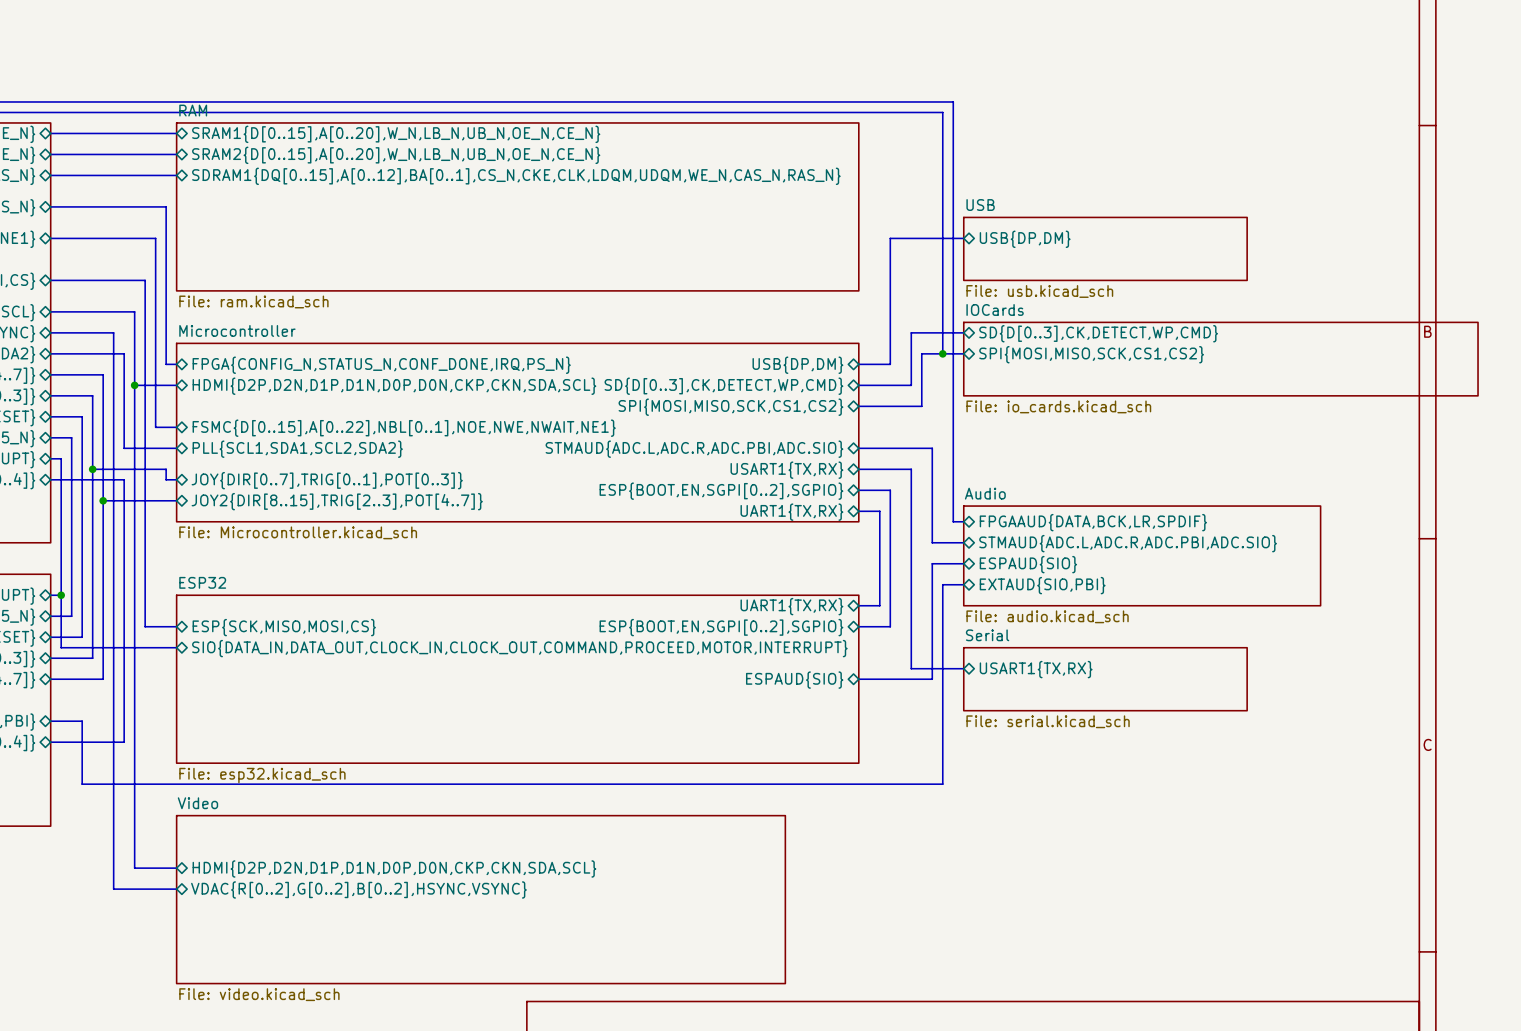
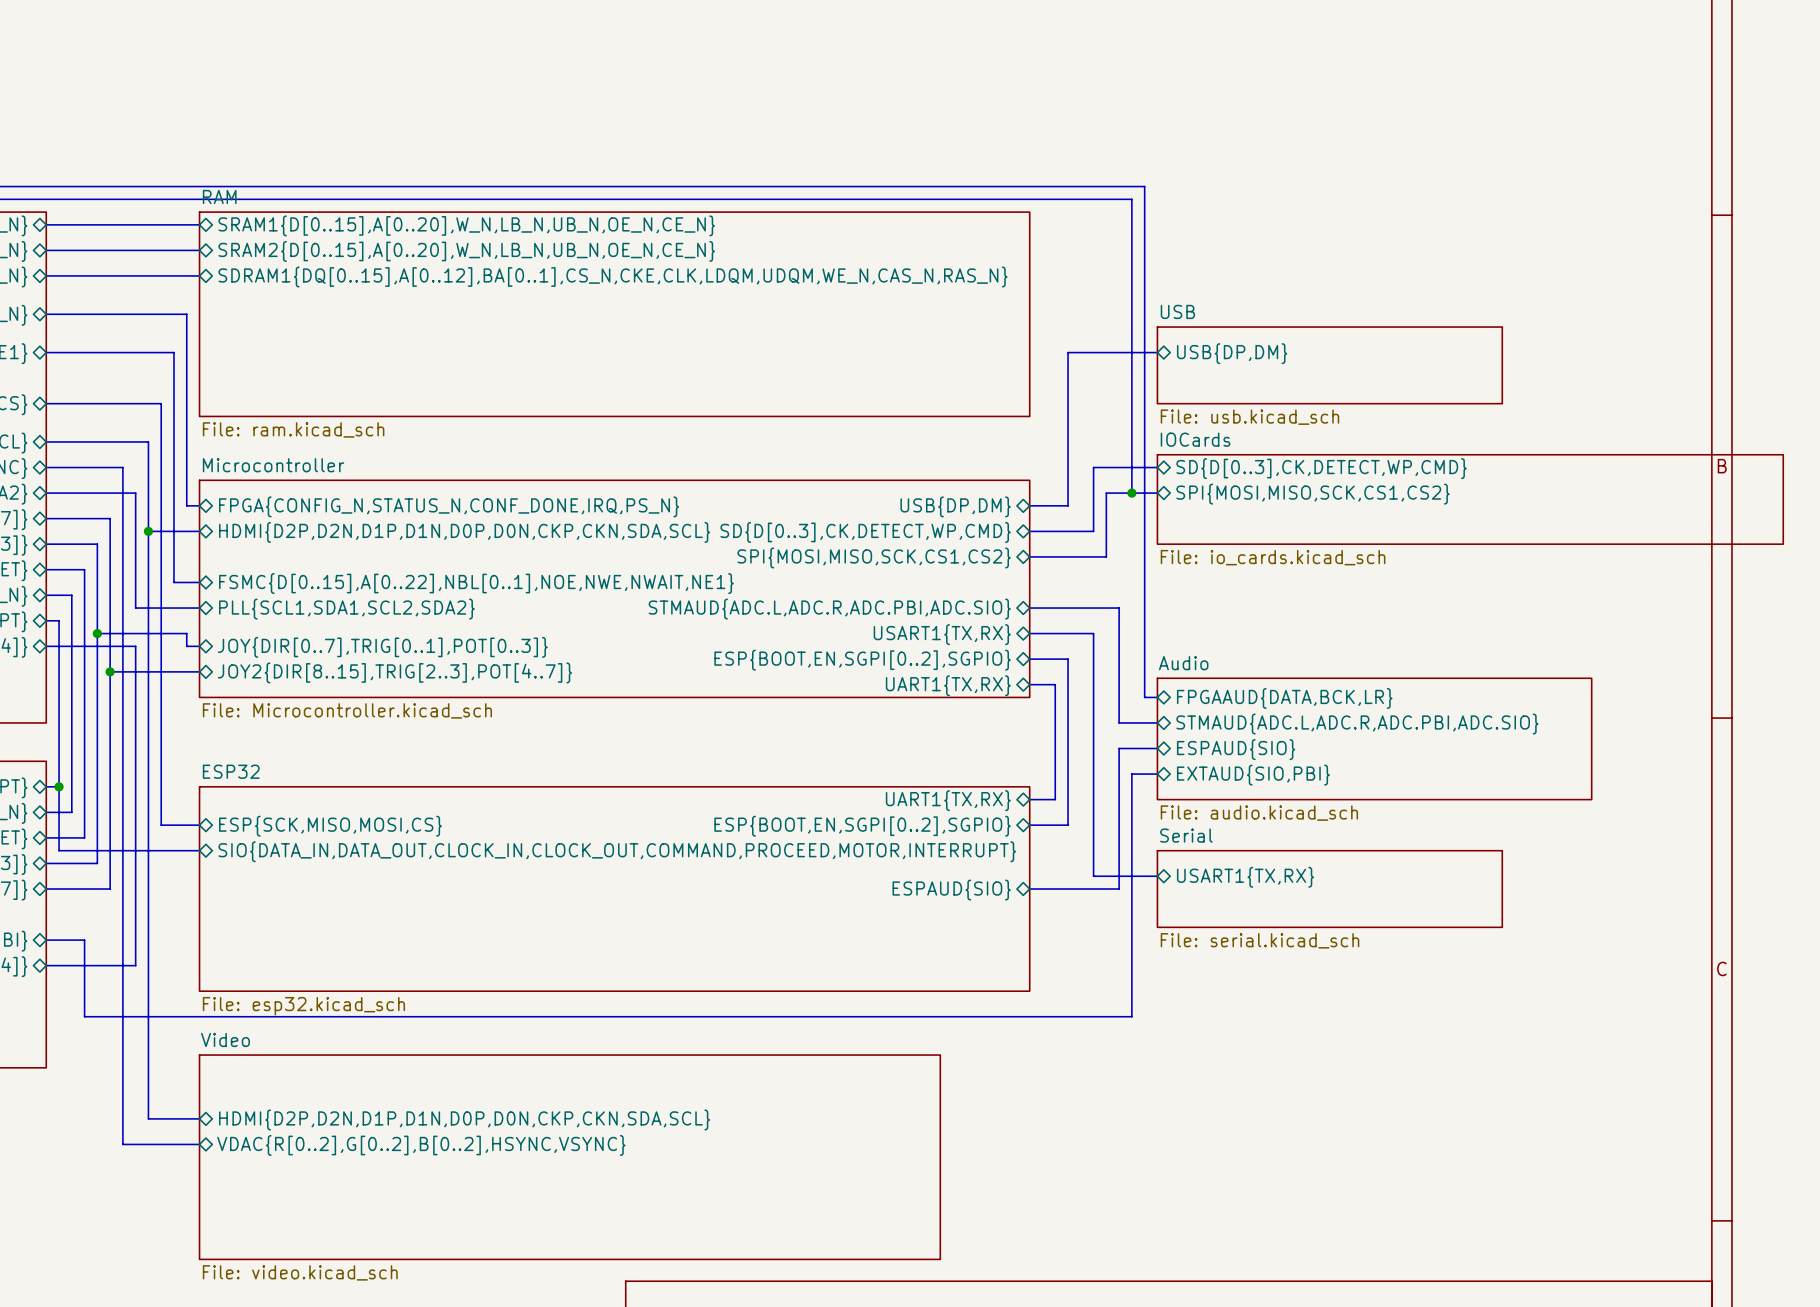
sheet pin: FPGAAUD{DATA,BCK,LR,SPDIF} (1093, 522) -> FPGAAUD{DATA,BCK,LR} (1284, 698)

